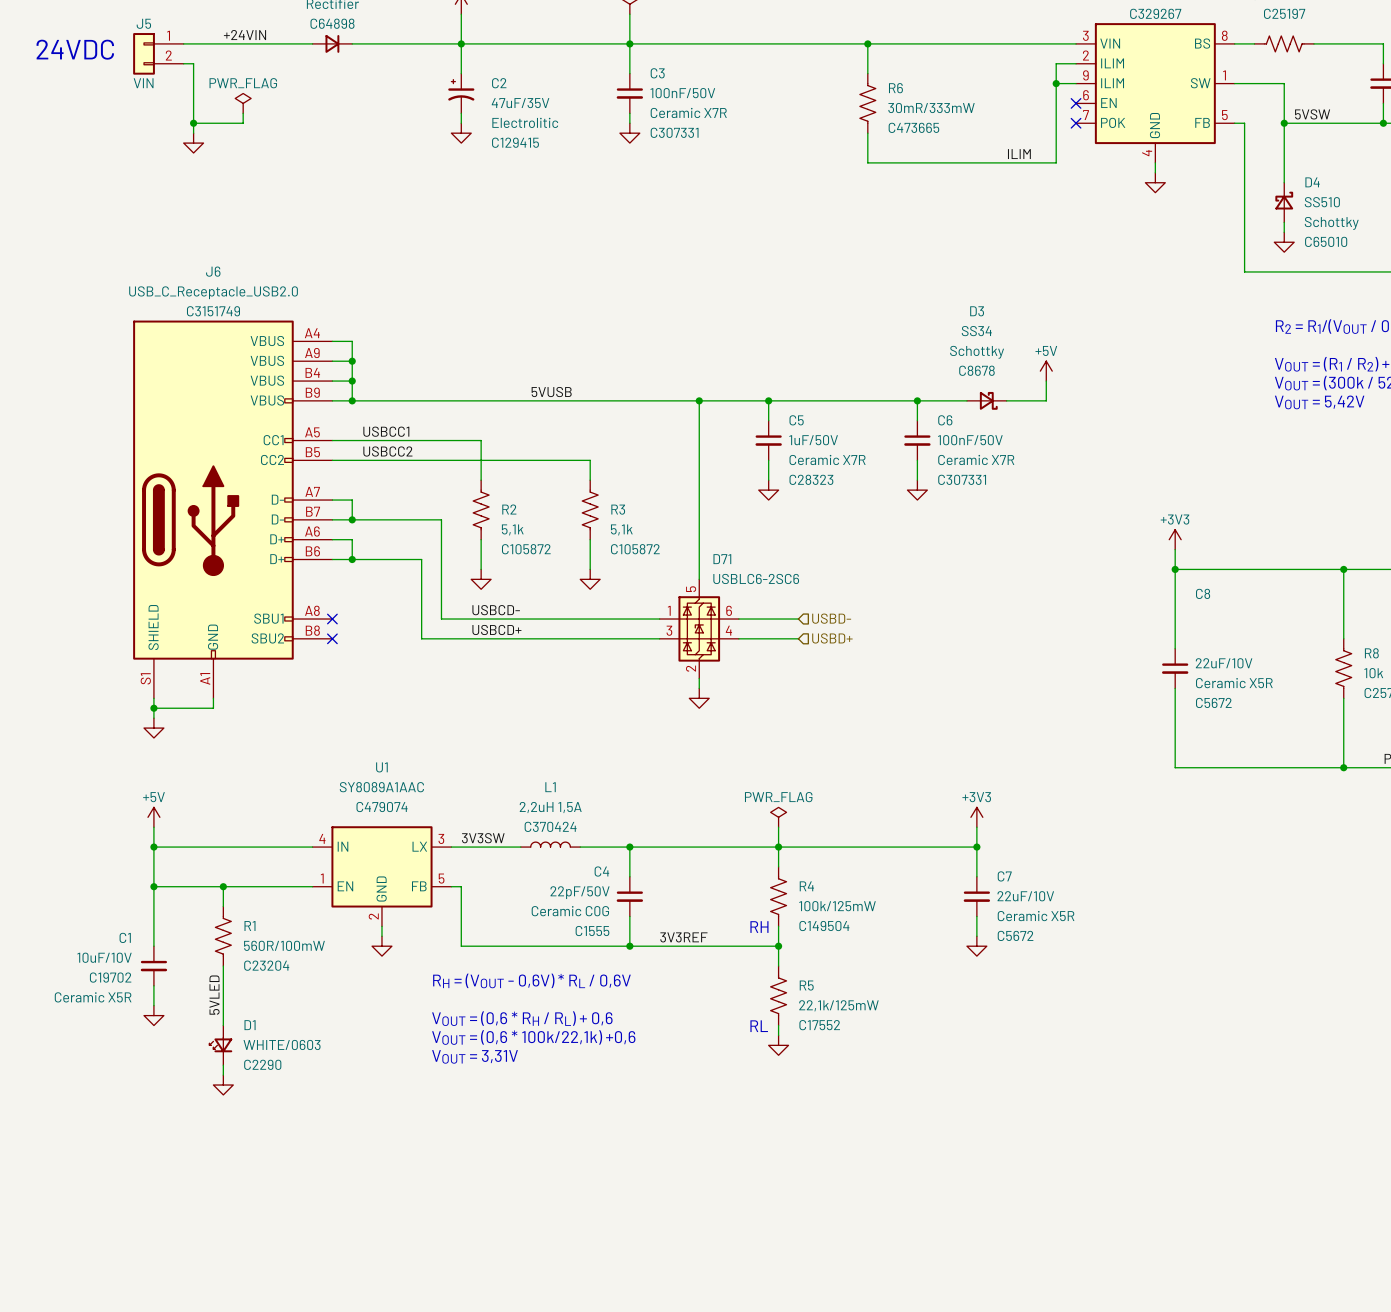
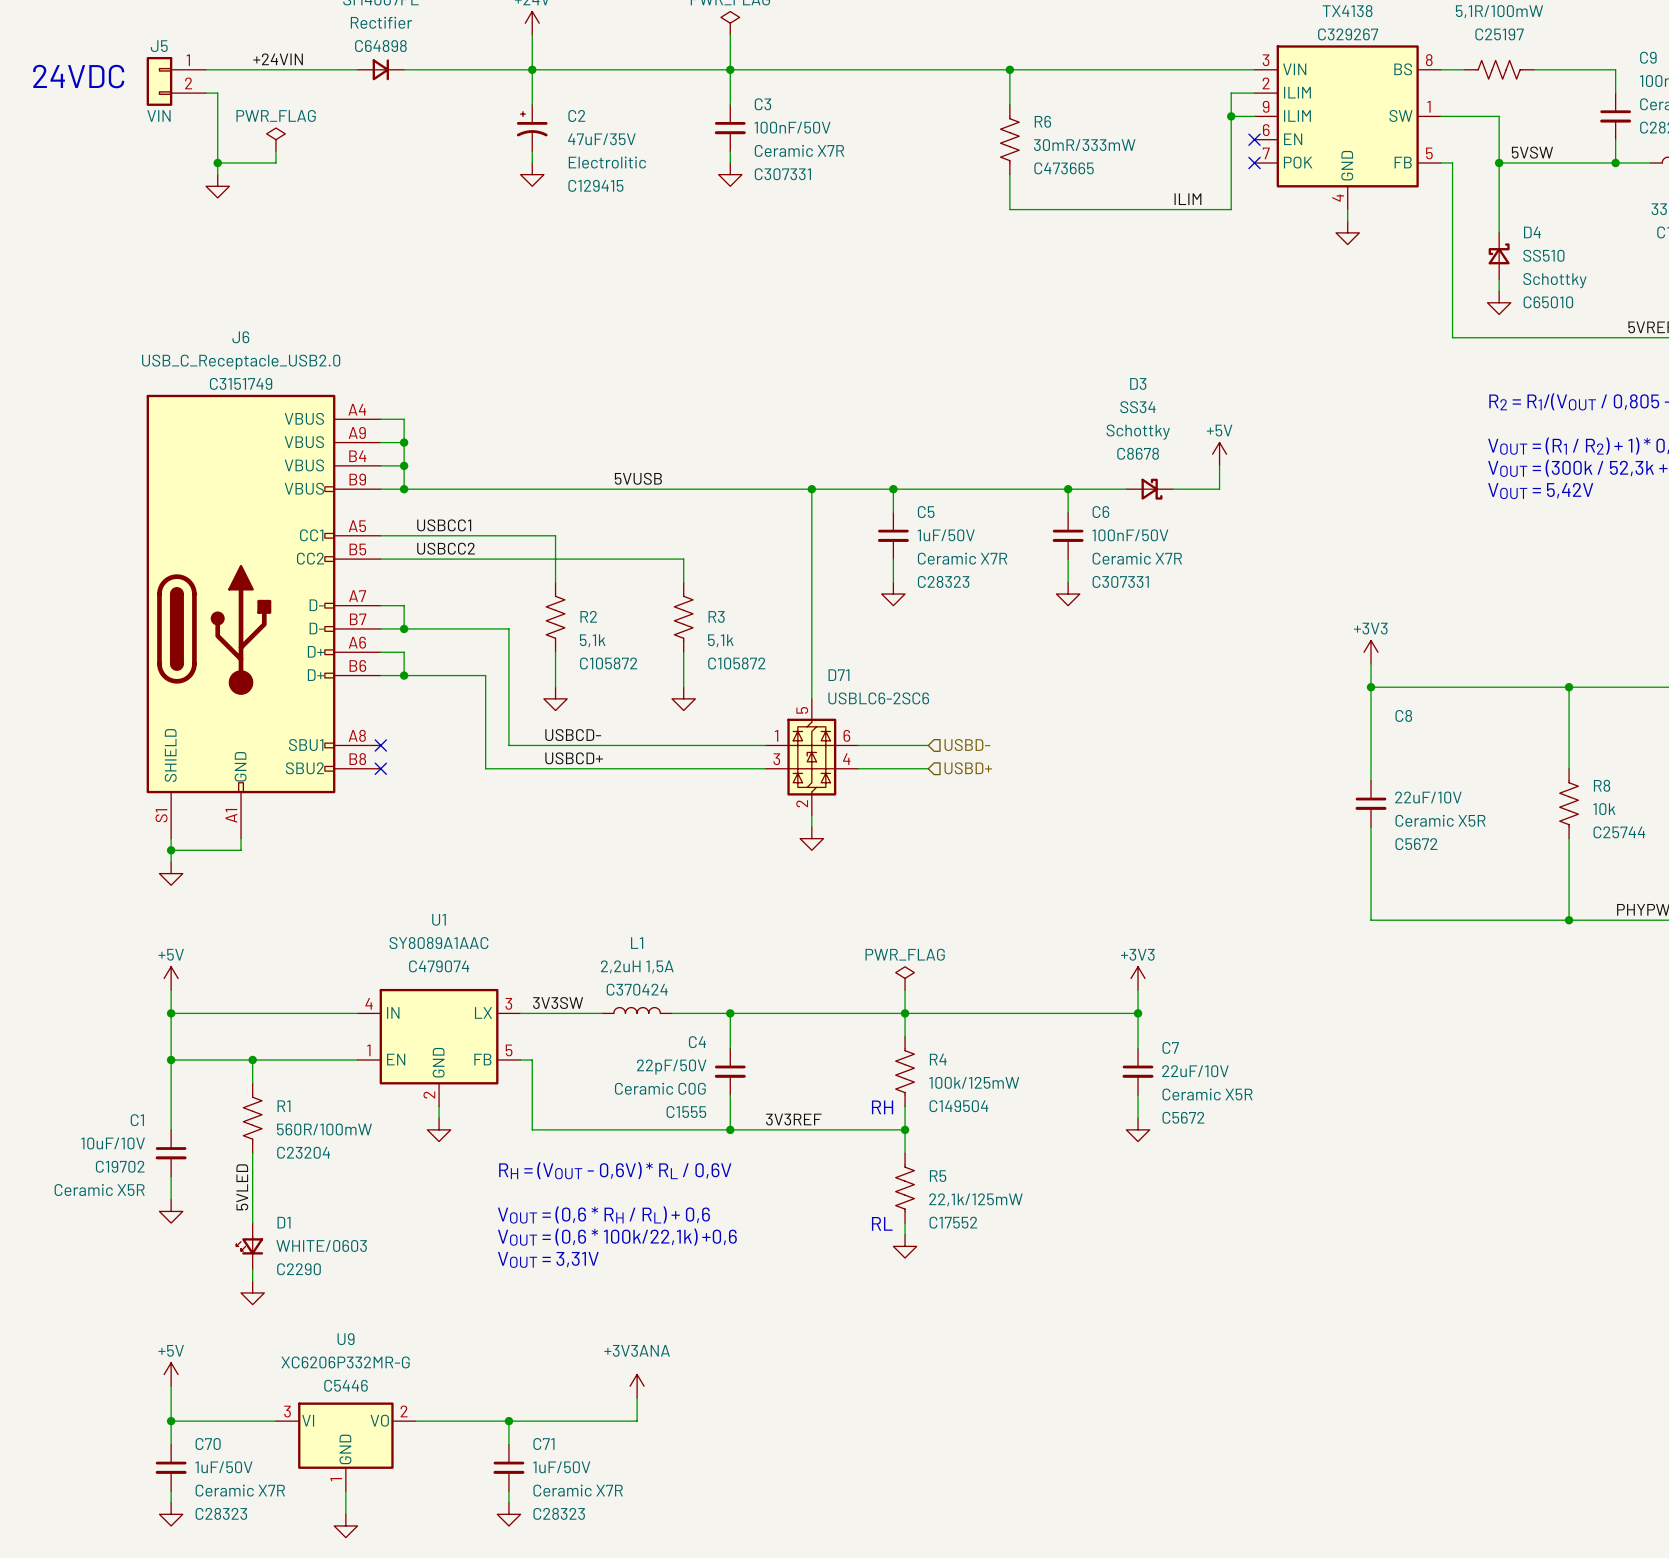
power symbol: none -> +5V (171, 1374)
wire: none -> (171, 1386) (171, 1444)
power symbol: none -> +3V3ANA (637, 1386)
wire: none -> (637, 1397) (637, 1421) (415, 1421)
wire: none -> (171, 1421) (275, 1421)
junction: none -> (171, 1421)
wire: none -> (508, 1421) (508, 1444)
junction: none -> (508, 1421)
U9: none -> XC6206P332MR-G (345, 1446)
C70: none -> 1uF/50V (171, 1467)
C71: none -> 1uF/50V (508, 1467)
wire: none -> (171, 1491) (171, 1502)
wire: none -> (345, 1491) (345, 1514)
wire: none -> (508, 1491) (508, 1502)
power symbol: none -> (171, 1514)
power symbol: none -> (508, 1514)
power symbol: none -> (345, 1525)

